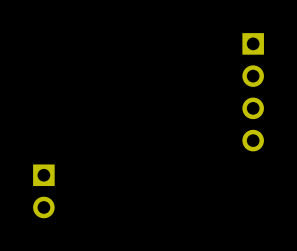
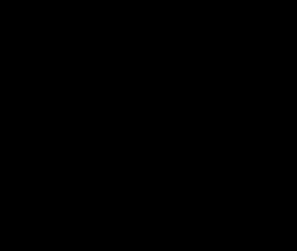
part: (253, 92) -> none
part: (43, 191) -> none

